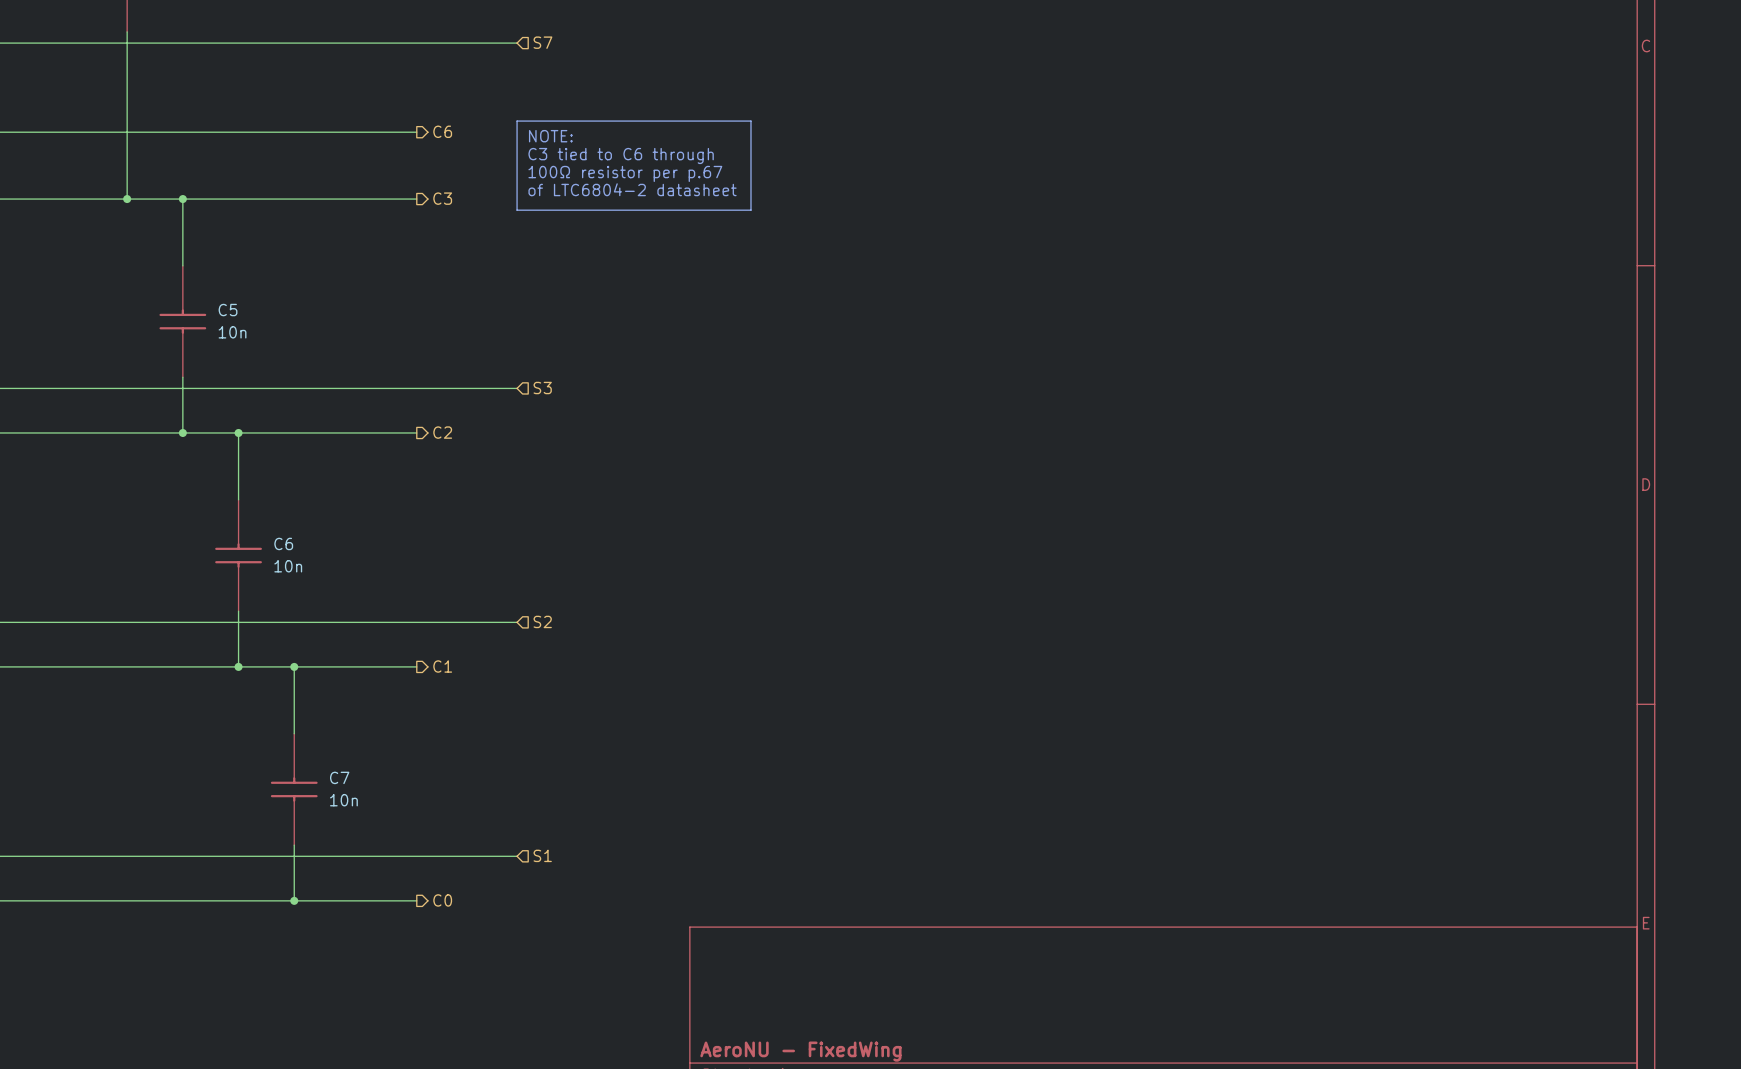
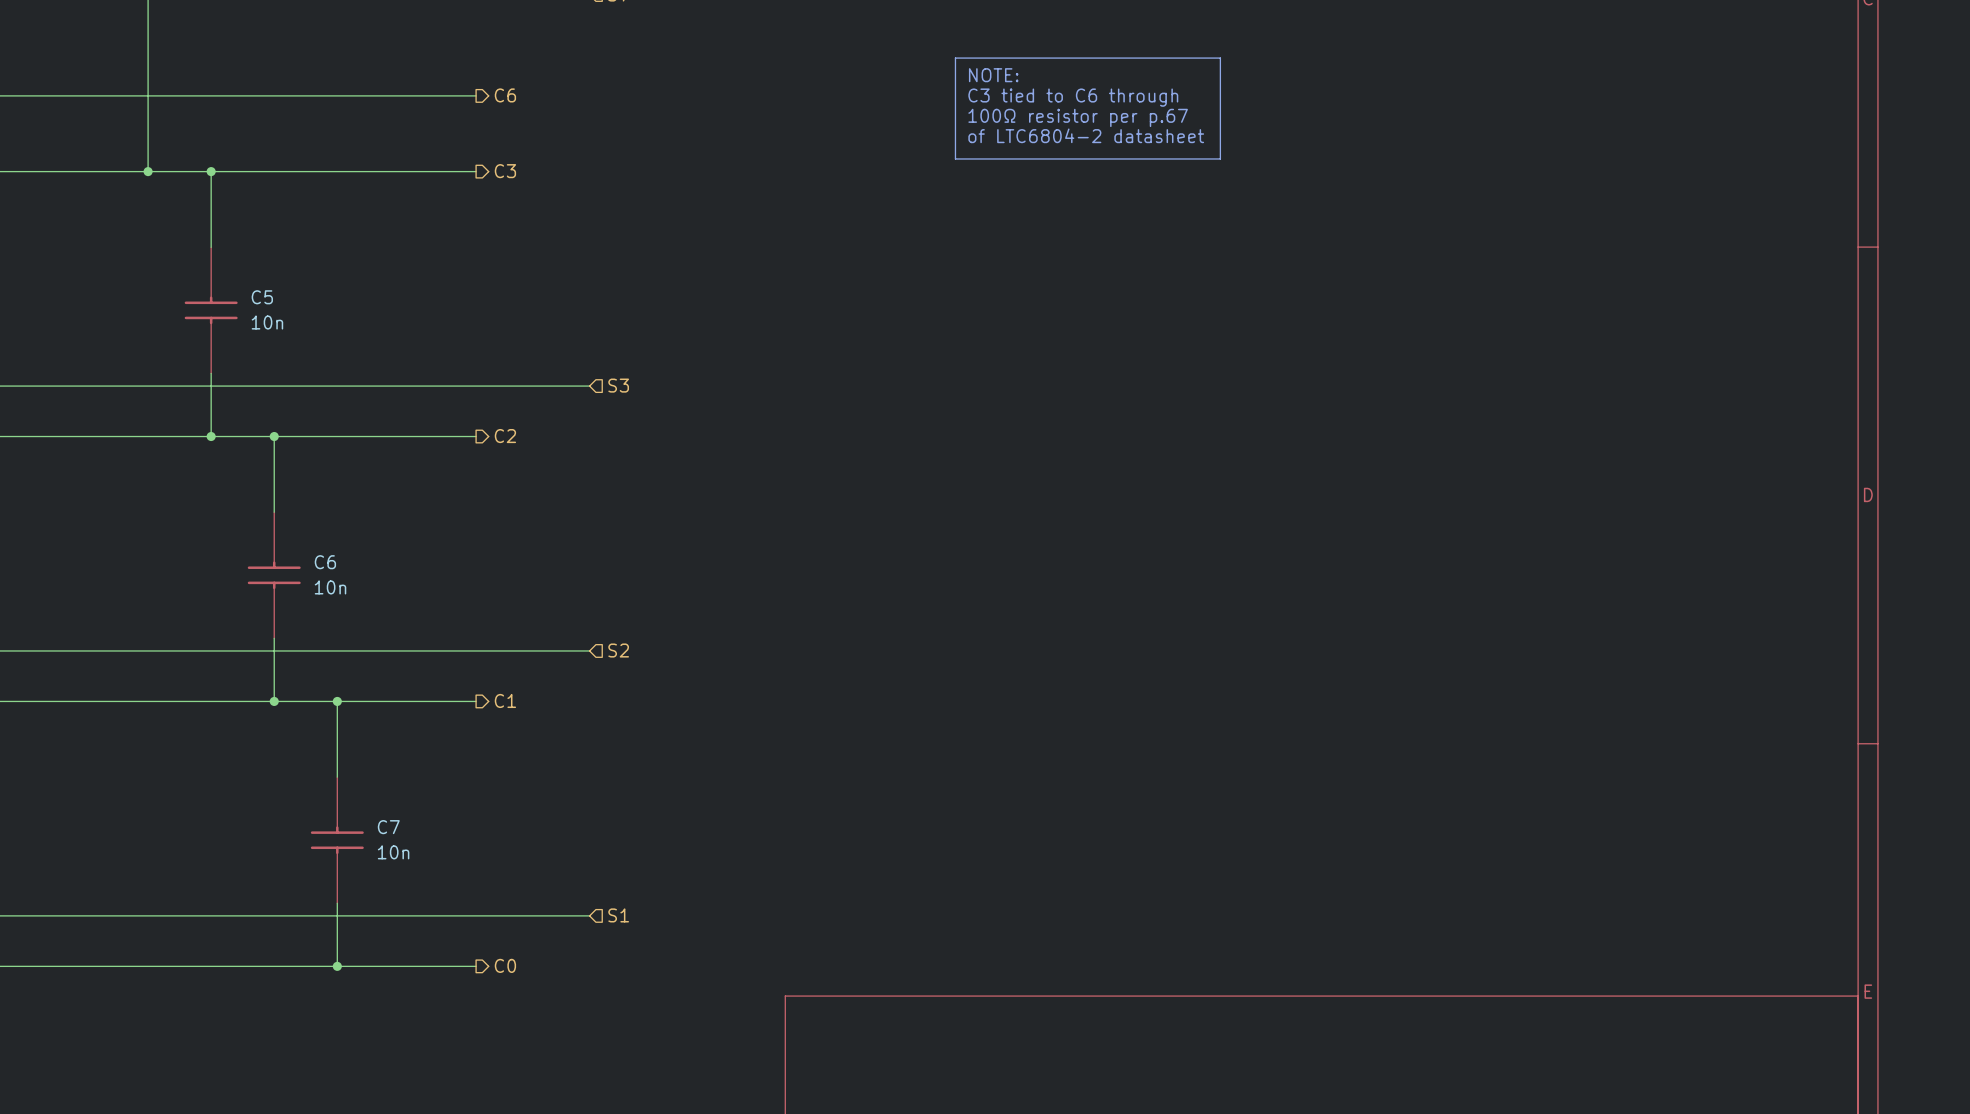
line: none -> (955, 58) (1220, 58) (1220, 158) (955, 158) (955, 58)
text: none -> NOTE: (993, 75)
line: (517, 121) (750, 121) (750, 210) (517, 210) (517, 121) -> none
text: none -> C3 tied to C6 through (1073, 97)
text: NOTE: (550, 136) -> none
text: none -> 100Ω resistor per p.67 (1078, 117)
text: C3 tied to C6 through (621, 155) -> none
text: none -> of LTC6804-2 datasheet (1086, 135)
text: 100Ω resistor per p.67 (625, 173) -> none
text: of LTC6804-2 datasheet (632, 189) -> none

